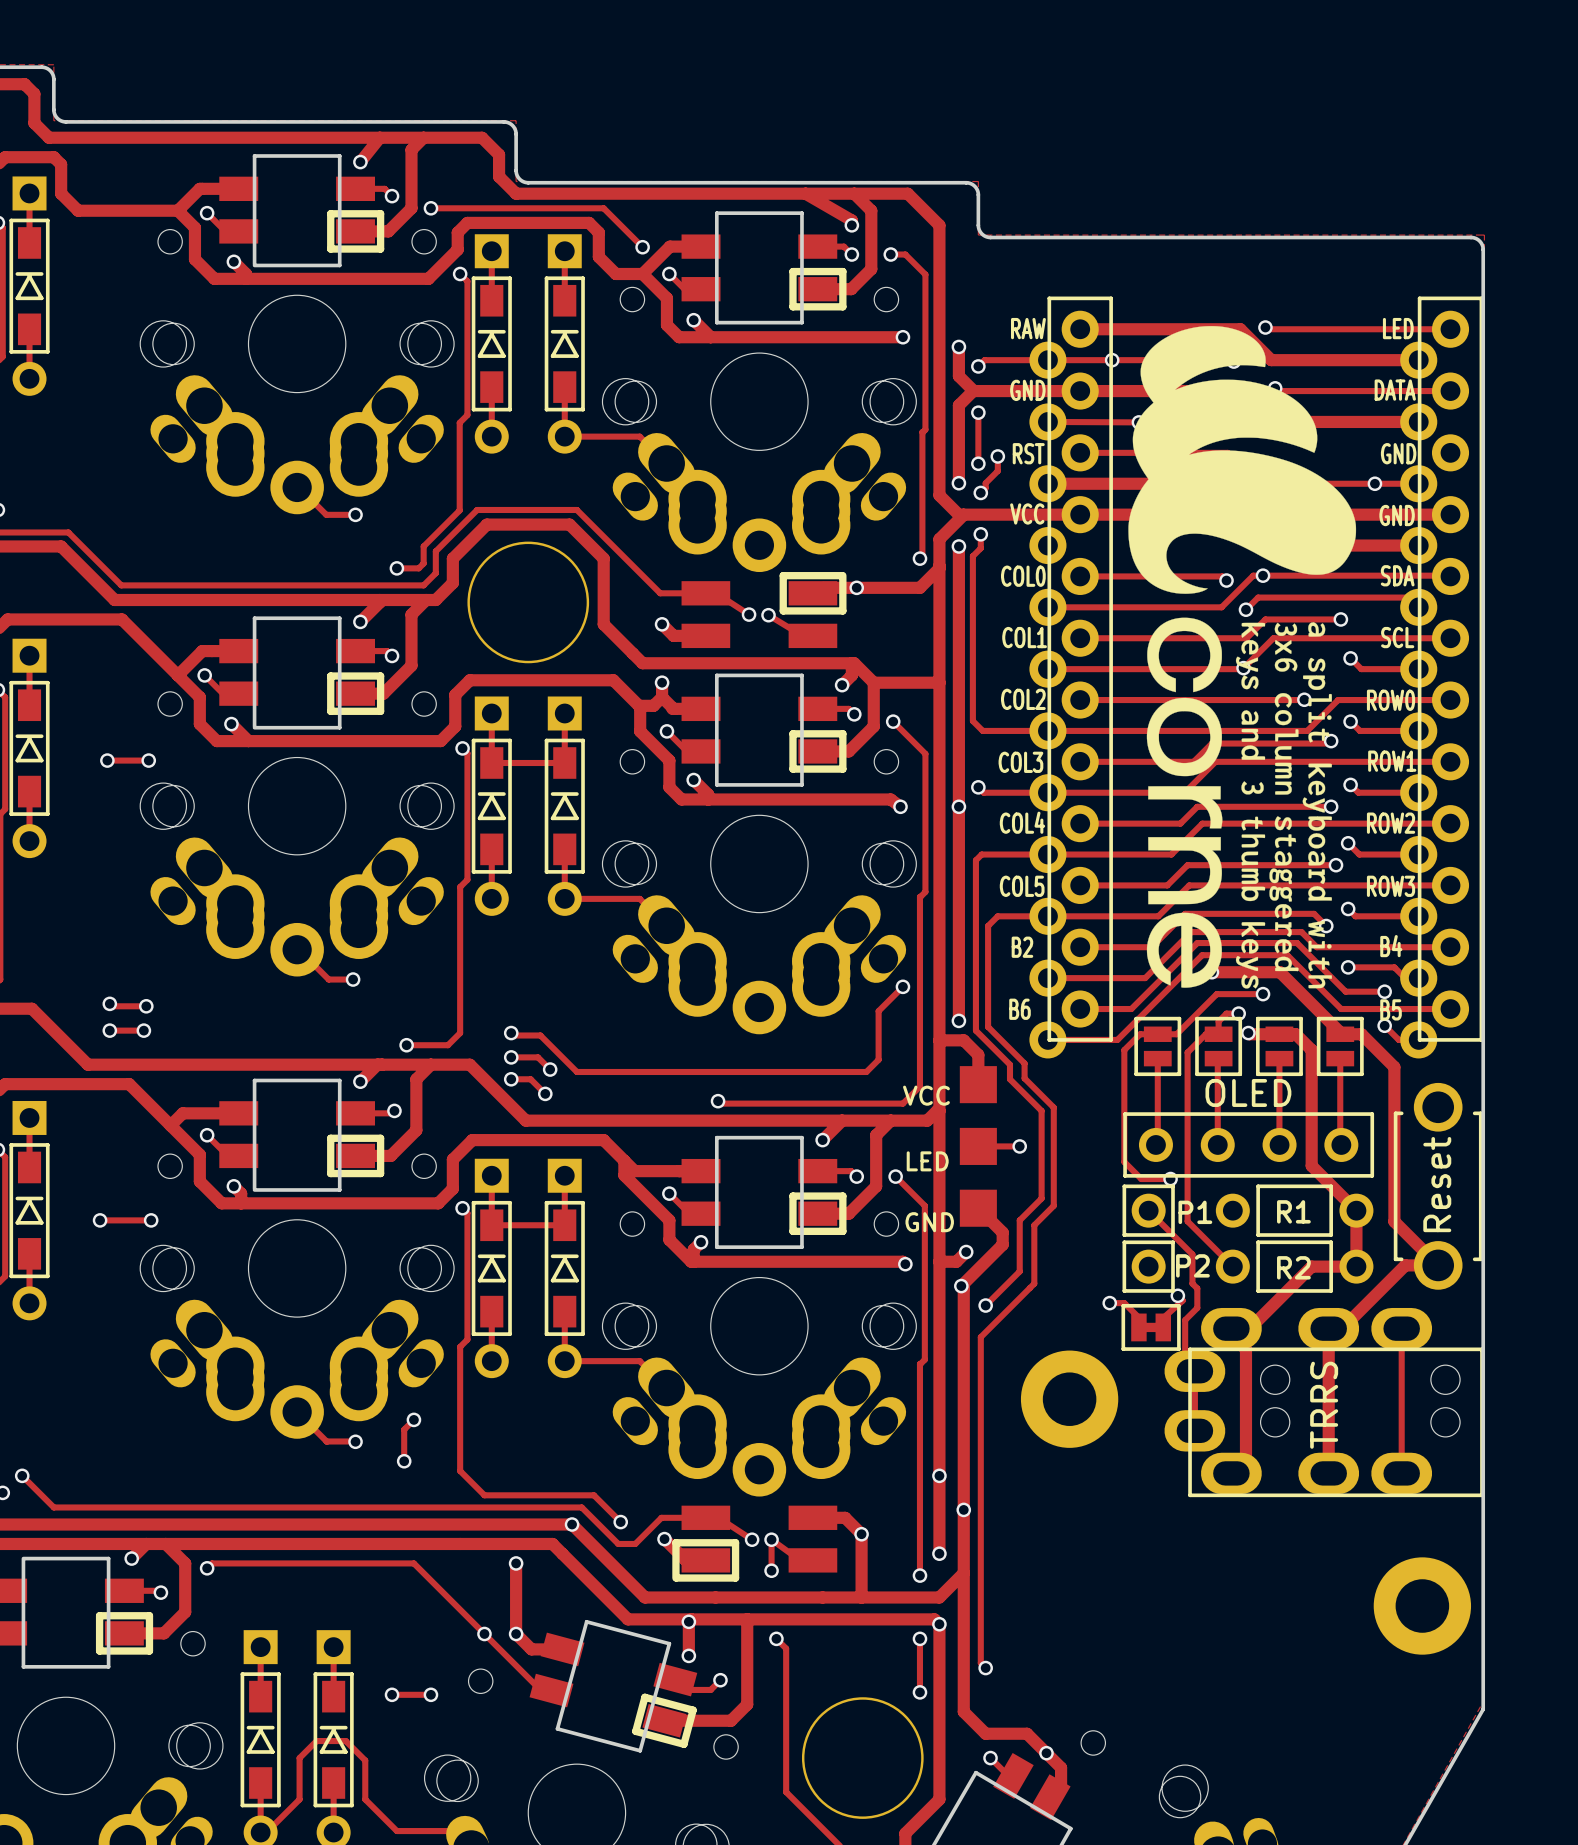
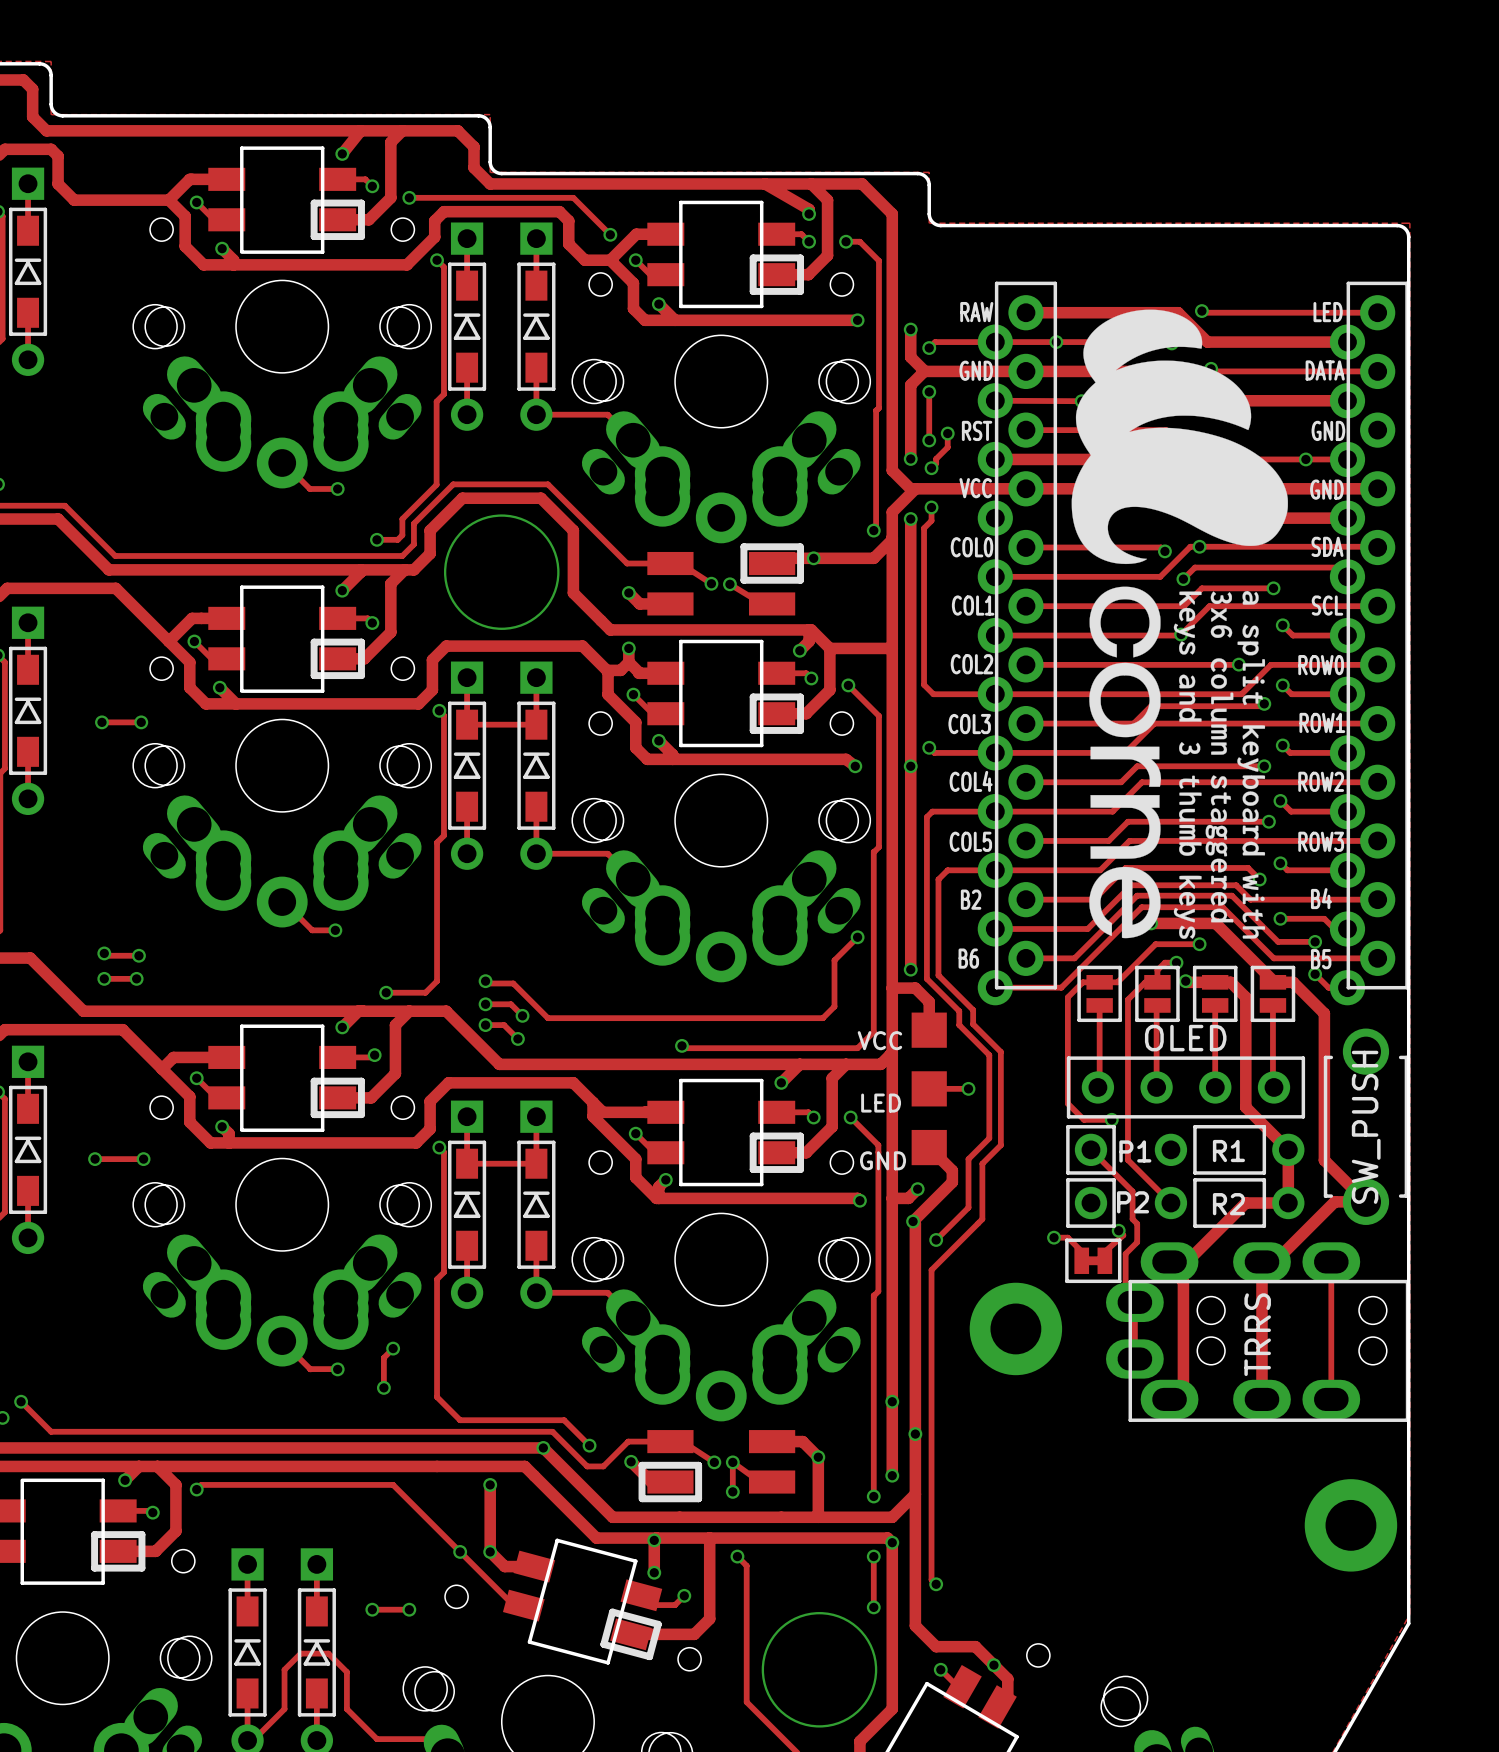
part value: Reset (1437, 1184) -> SW_PUSH (1366, 1127)

